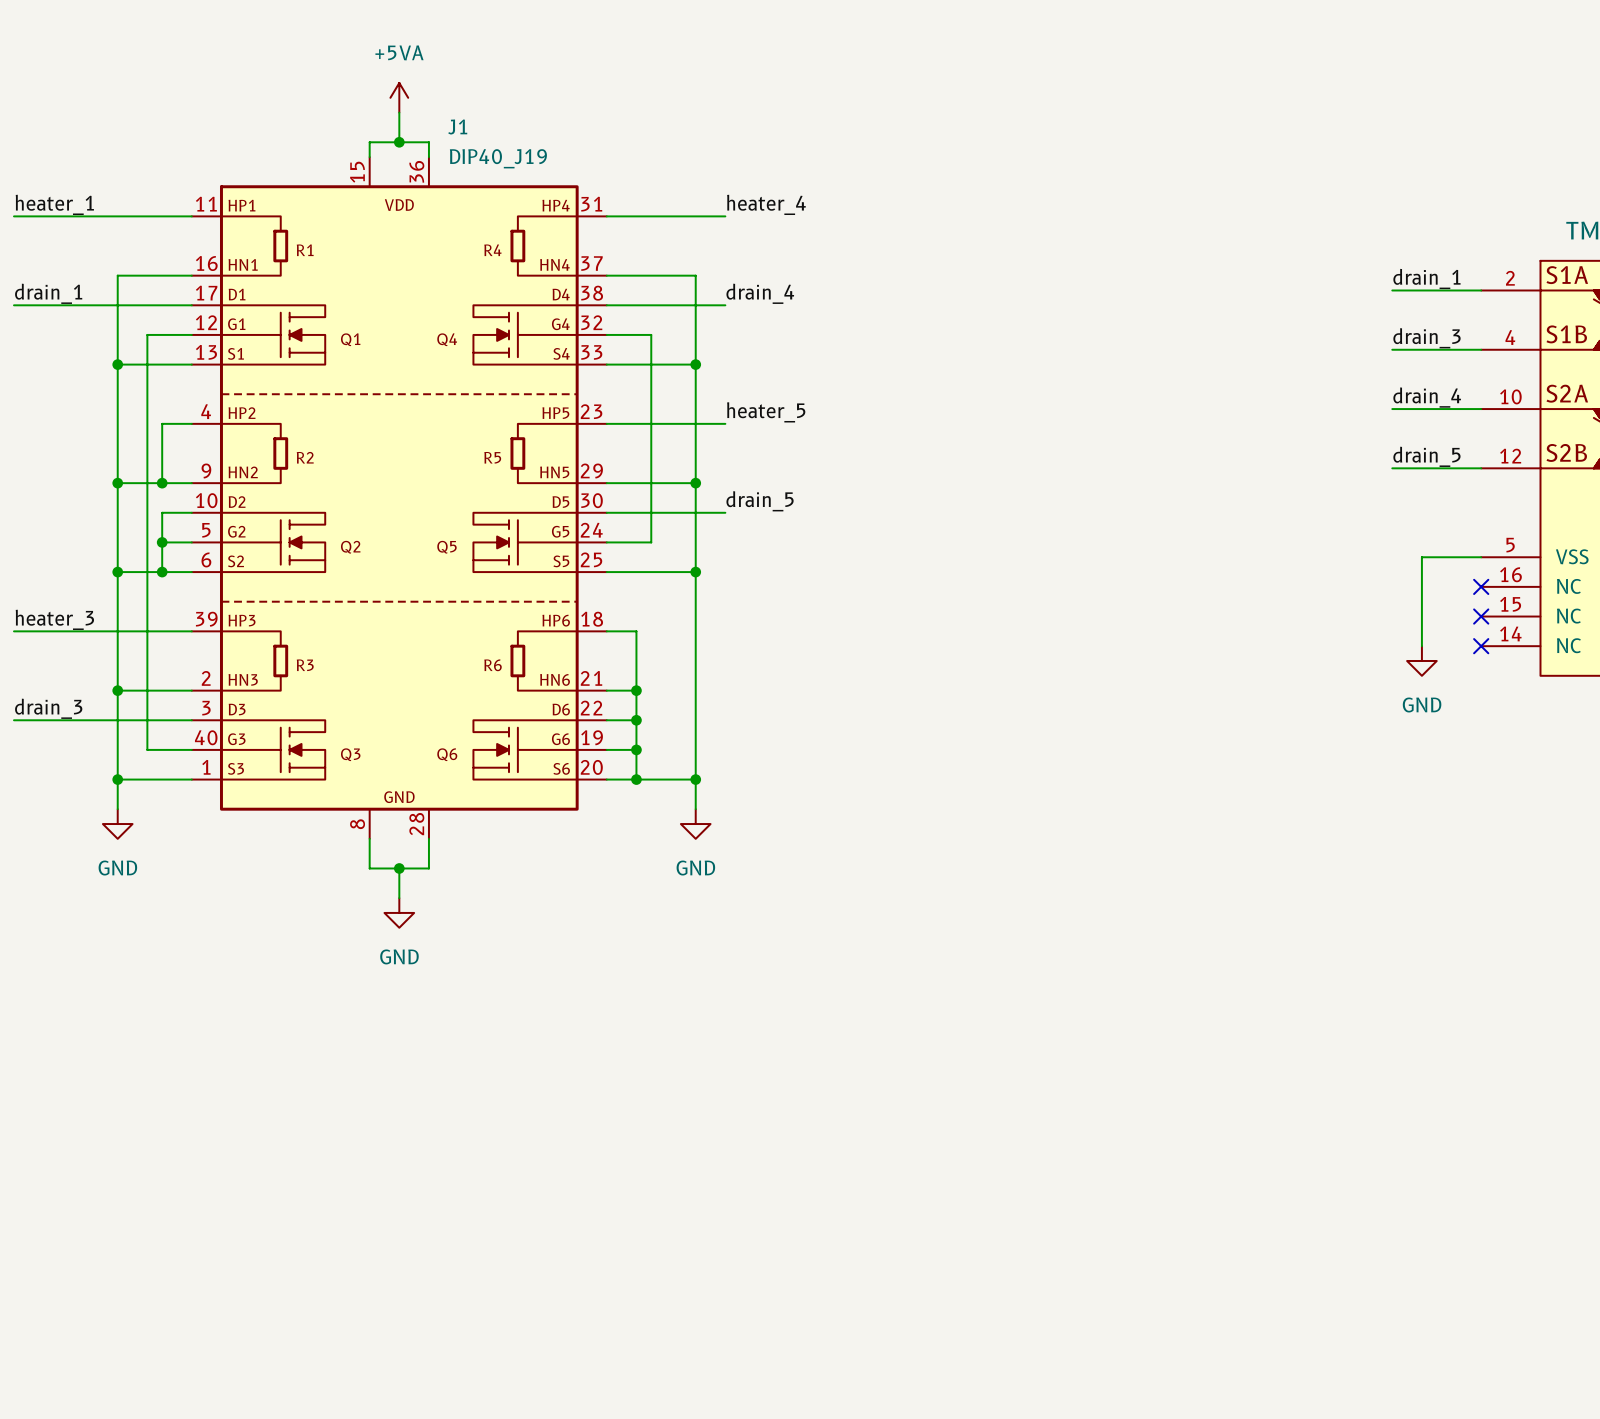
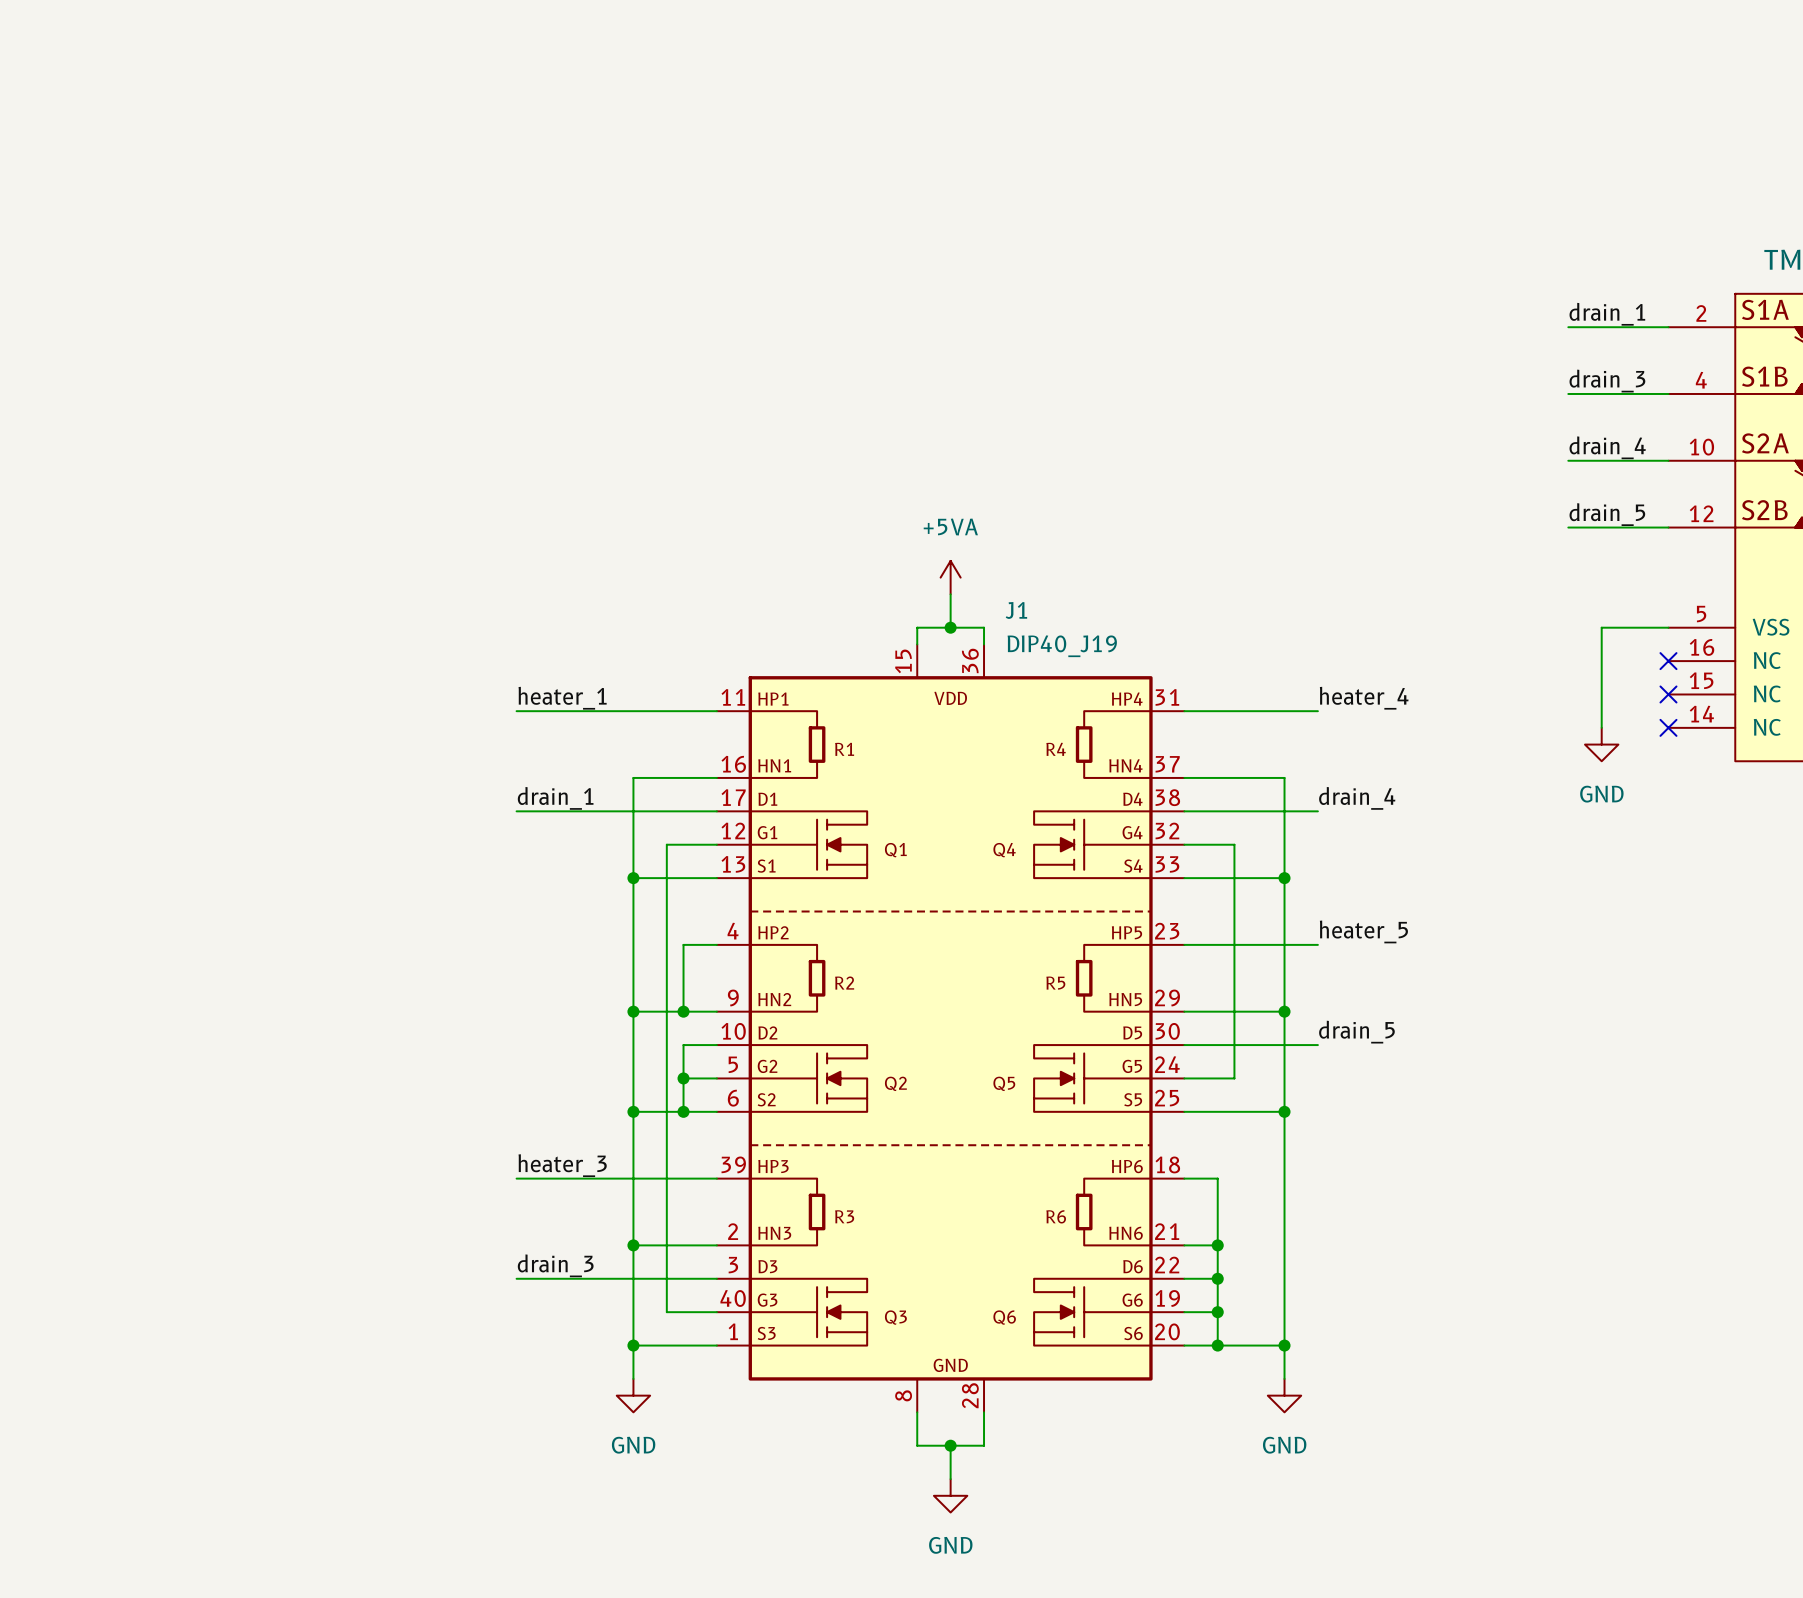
power symbol: +5VA (399, 97) -> none
wire: (399, 112) (399, 142) -> none
junction: (399, 142) -> none
wire: (369, 157) (369, 142) (428, 142) (428, 157) -> none
label: heater_1 (54, 204) -> none
label: heater_4 (766, 204) -> none
wire: (13, 216) (191, 216) -> none
wire: (606, 216) (725, 216) -> none
wire: (191, 275) (117, 275) (117, 809) -> none
wire: (606, 275) (695, 275) (695, 809) -> none
label: drain_1 (48, 293) -> none
label: drain_4 (760, 293) -> none
wire: (13, 305) (191, 305) -> none
wire: (606, 305) (725, 305) -> none
wire: (191, 334) (147, 334) (147, 749) (191, 749) -> none
wire: (606, 334) (651, 334) (651, 542) (606, 542) -> none
wire: (117, 364) (191, 364) -> none
junction: (117, 364) -> none
wire: (606, 364) (695, 364) -> none
junction: (695, 364) -> none
label: heater_5 (766, 412) -> none
wire: (191, 423) (162, 423) (162, 483) -> none
wire: (606, 423) (725, 423) -> none
wire: (117, 483) (191, 483) -> none
junction: (117, 483) -> none
junction: (162, 483) -> none
wire: (606, 483) (695, 483) -> none
junction: (695, 483) -> none
J1 position: (399, 497) -> (950, 1028)
label: drain_5 (760, 501) -> none
wire: (191, 512) (162, 512) (162, 572) -> none
wire: (606, 512) (725, 512) -> none
power symbol: none -> +5VA (950, 577)
wire: none -> (950, 594) (950, 627)
wire: (162, 542) (191, 542) -> none
junction: (162, 542) -> none
junction: none -> (950, 627)
wire: (117, 572) (191, 572) -> none
junction: (117, 572) -> none
junction: (162, 572) -> none
wire: (606, 572) (695, 572) -> none
junction: (695, 572) -> none
wire: none -> (917, 644) (917, 627) (984, 627) (984, 644)
label: heater_3 (54, 619) -> none
label: none -> heater_1 (562, 698)
label: none -> heater_4 (1364, 698)
wire: (13, 631) (191, 631) -> none
wire: (636, 631) (636, 779) (695, 779) -> none
wire: none -> (1184, 711) (1317, 711)
wire: (117, 690) (191, 690) -> none
junction: (117, 690) -> none
wire: none -> (683, 777) (633, 777) (633, 1378)
junction: (636, 690) -> none
wire: none -> (1184, 777) (1284, 777) (1284, 1378)
label: drain_3 (48, 708) -> none
label: none -> drain_1 (555, 798)
label: none -> drain_4 (1357, 798)
wire: (13, 720) (191, 720) -> none
junction: (636, 720) -> none
wire: none -> (1184, 811) (1317, 811)
wire: none -> (683, 844) (666, 844) (666, 1312) (716, 1312)
junction: (636, 749) -> none
wire: none -> (1184, 844) (1234, 844) (1234, 1078) (1184, 1078)
wire: (117, 779) (191, 779) -> none
junction: (117, 779) -> none
junction: none -> (633, 878)
junction: (636, 779) -> none
junction: (695, 779) -> none
wire: none -> (1184, 878) (1284, 878)
junction: none -> (1284, 878)
power symbol: GND (117, 824) -> none
power symbol: GND (695, 824) -> none
label: none -> heater_5 (1363, 931)
wire: (369, 838) (369, 868) (428, 868) (428, 838) -> none
wire: none -> (716, 944) (683, 944) (683, 1011)
wire: none -> (1184, 944) (1317, 944)
wire: (399, 868) (399, 898) -> none
junction: (399, 868) -> none
wire: none -> (633, 1011) (716, 1011)
junction: none -> (633, 1011)
junction: none -> (683, 1011)
wire: none -> (1184, 1011) (1284, 1011)
junction: none -> (1284, 1011)
power symbol: GND (399, 912) -> none
label: none -> drain_5 (1356, 1032)
wire: none -> (716, 1045) (683, 1045) (683, 1111)
wire: none -> (1184, 1045) (1317, 1045)
wire: none -> (683, 1078) (716, 1078)
junction: none -> (683, 1078)
wire: none -> (633, 1111) (716, 1111)
junction: none -> (633, 1111)
junction: none -> (683, 1111)
wire: none -> (1184, 1111) (1284, 1111)
junction: none -> (1284, 1111)
label: none -> heater_3 (562, 1165)
wire: none -> (516, 1178) (716, 1178)
wire: none -> (1184, 1178) (1217, 1178) (1217, 1345)
wire: none -> (633, 1245) (716, 1245)
junction: none -> (633, 1245)
wire: none -> (1184, 1245) (1217, 1245)
junction: none -> (1217, 1245)
label: none -> drain_3 (555, 1265)
wire: none -> (516, 1278) (716, 1278)
wire: none -> (1184, 1278) (1217, 1278)
junction: none -> (1217, 1278)
wire: none -> (1184, 1312) (1217, 1312)
junction: none -> (1217, 1312)
wire: none -> (633, 1345) (716, 1345)
junction: none -> (633, 1345)
wire: none -> (1184, 1345) (1284, 1345)
junction: none -> (1217, 1345)
junction: none -> (1284, 1345)
power symbol: none -> GND (633, 1395)
power symbol: none -> GND (1284, 1395)
wire: none -> (917, 1412) (917, 1445) (984, 1445) (984, 1412)
wire: none -> (950, 1445) (950, 1479)
junction: none -> (950, 1445)
power symbol: none -> GND (950, 1495)

